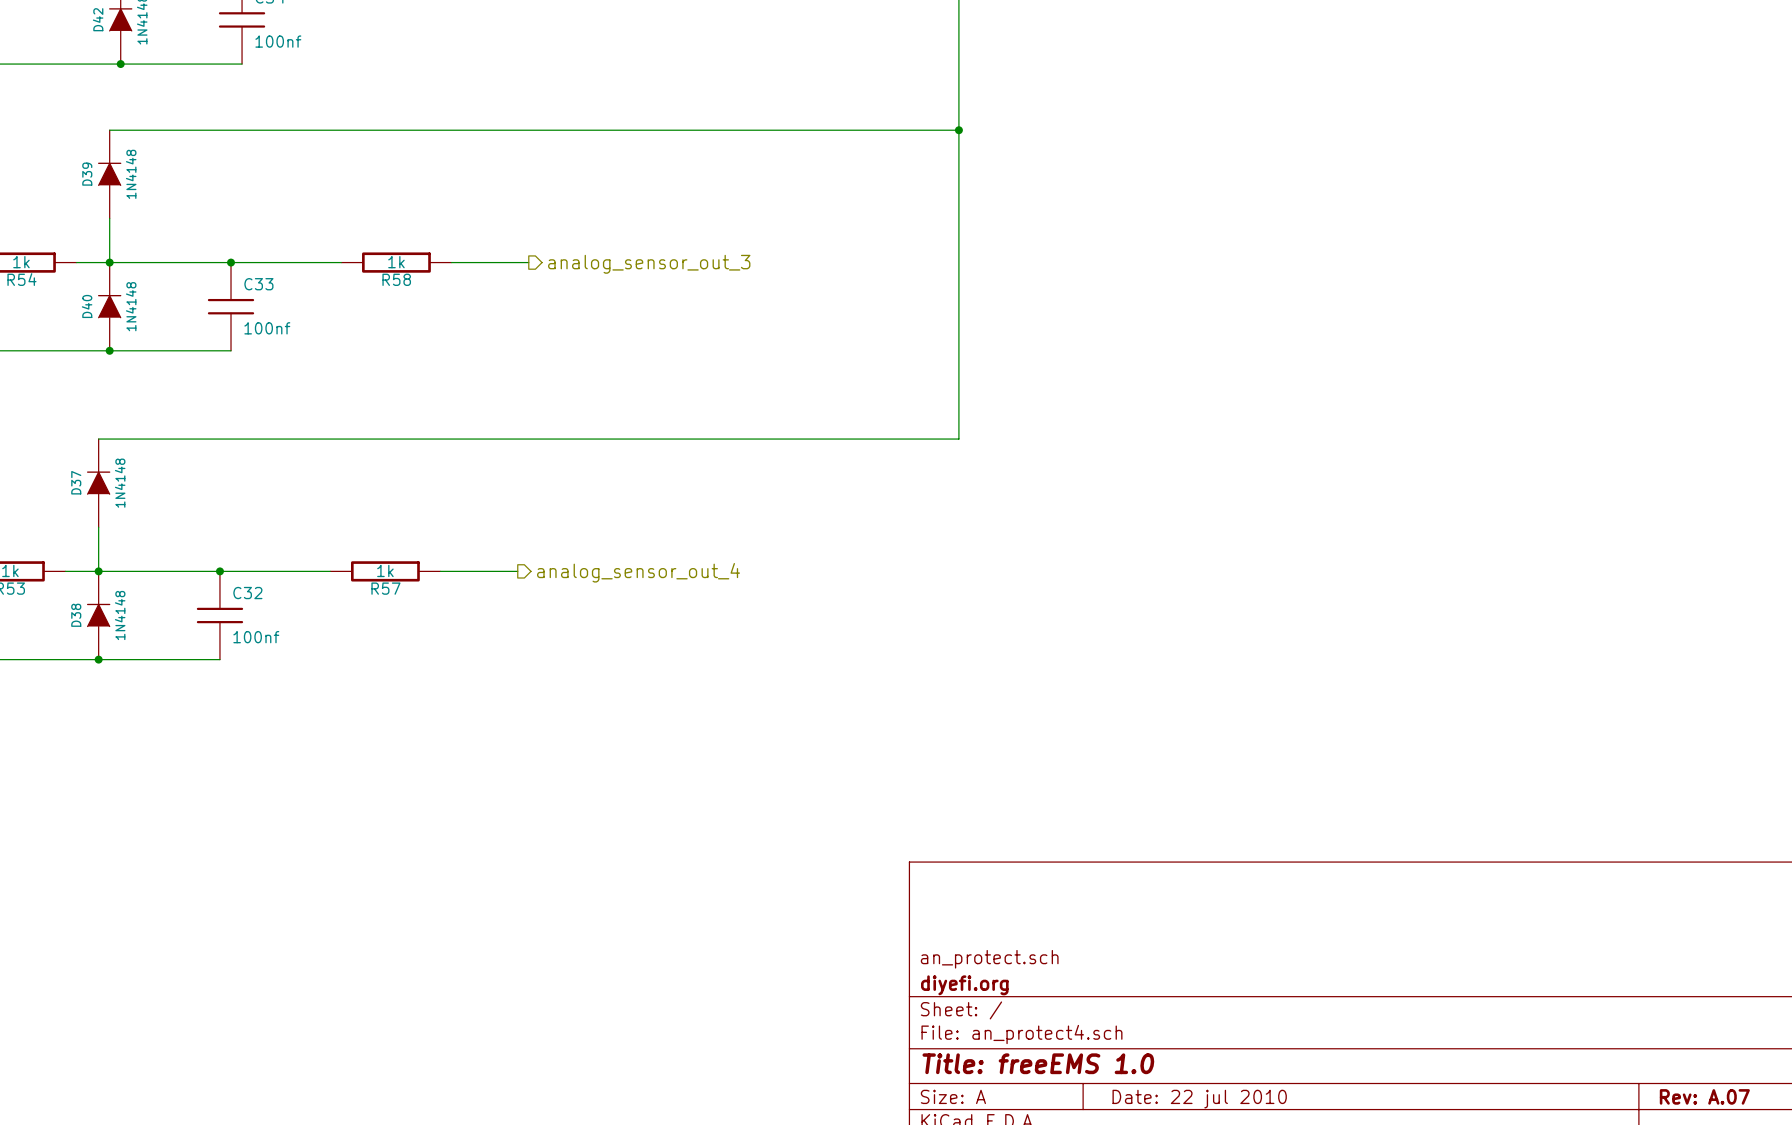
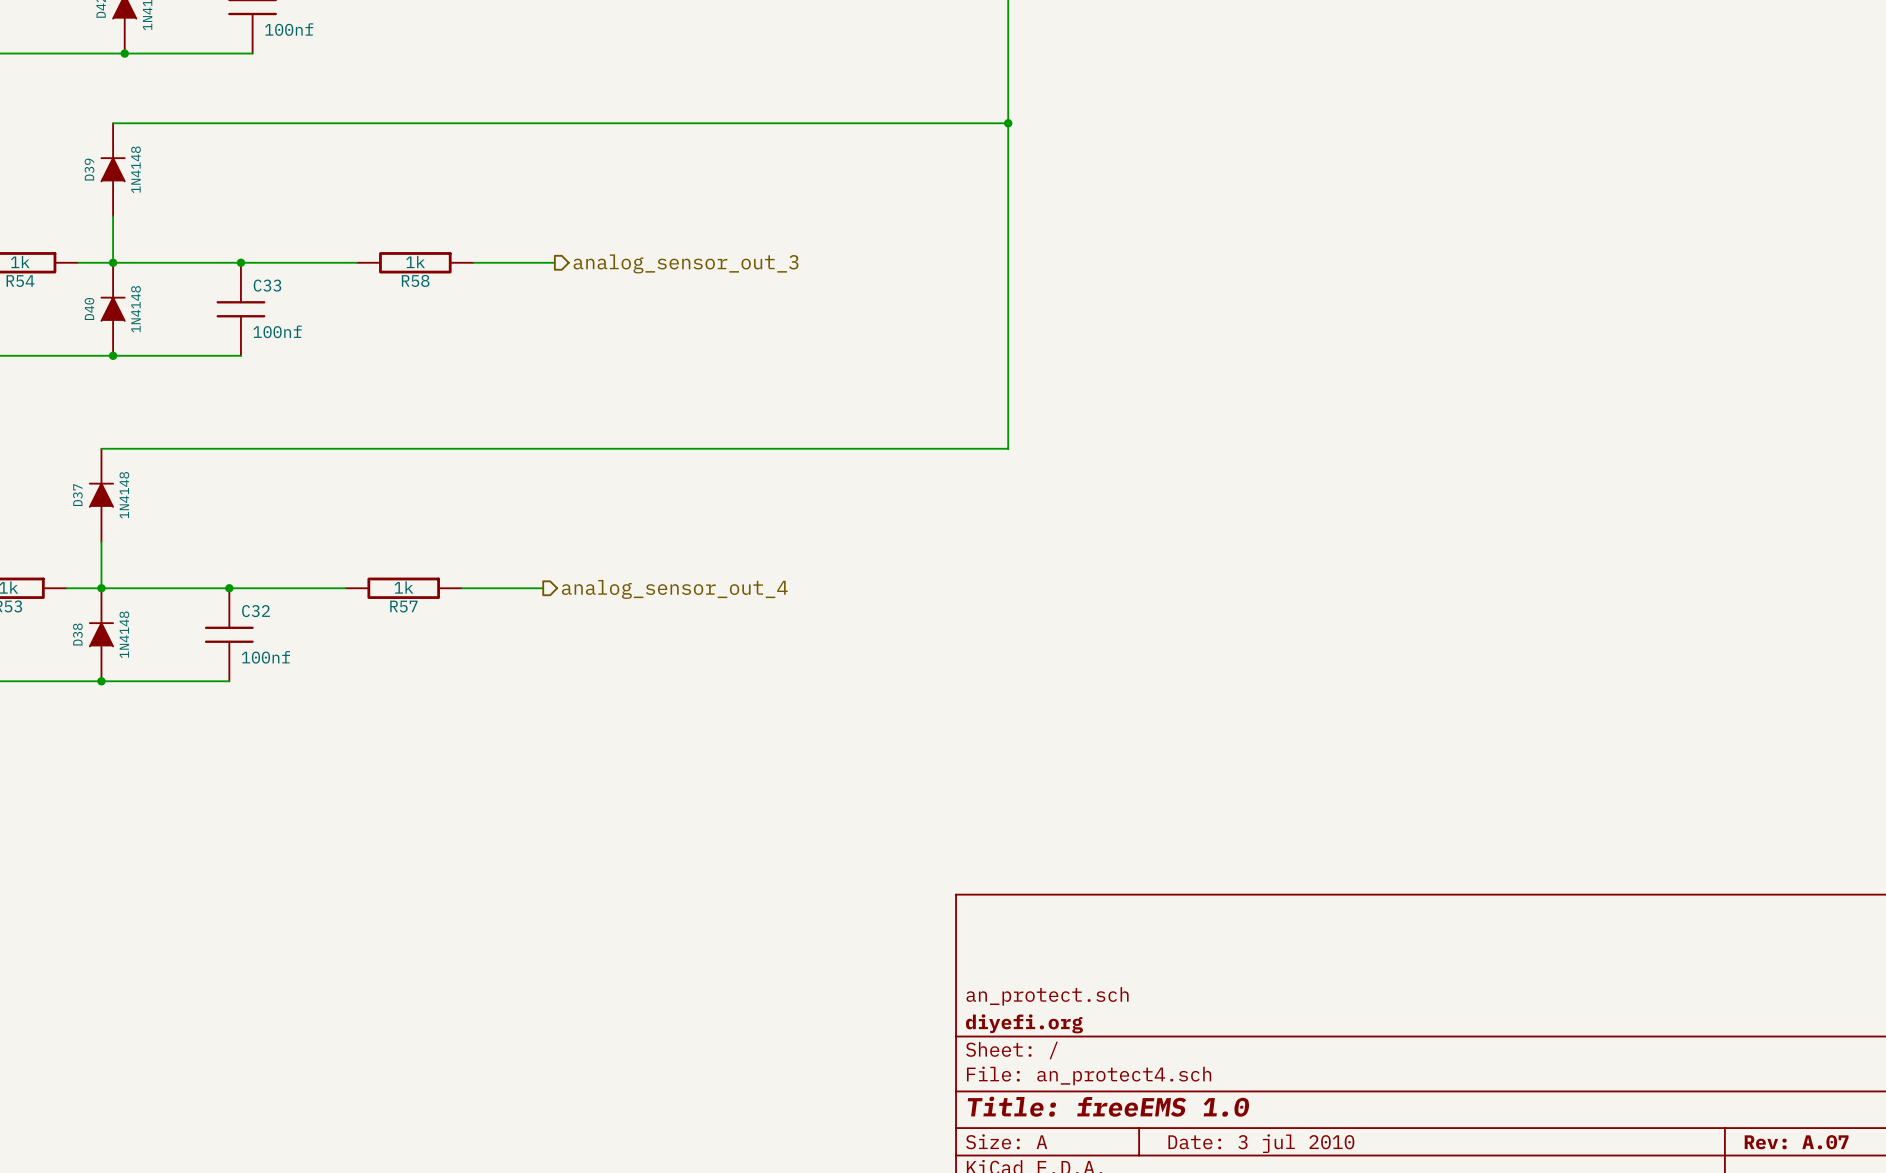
title block: Date: 22 jul 2010 (1199, 1099) -> Date: 3 jul 2010 (1261, 1143)

